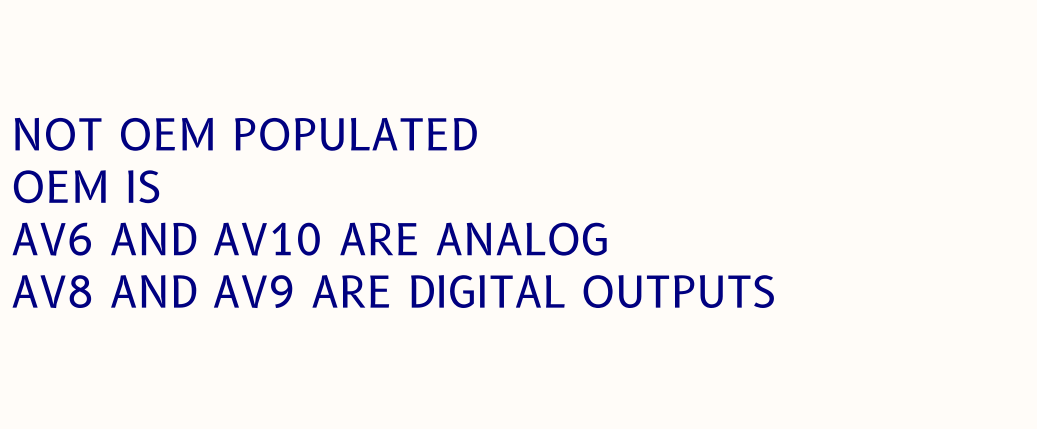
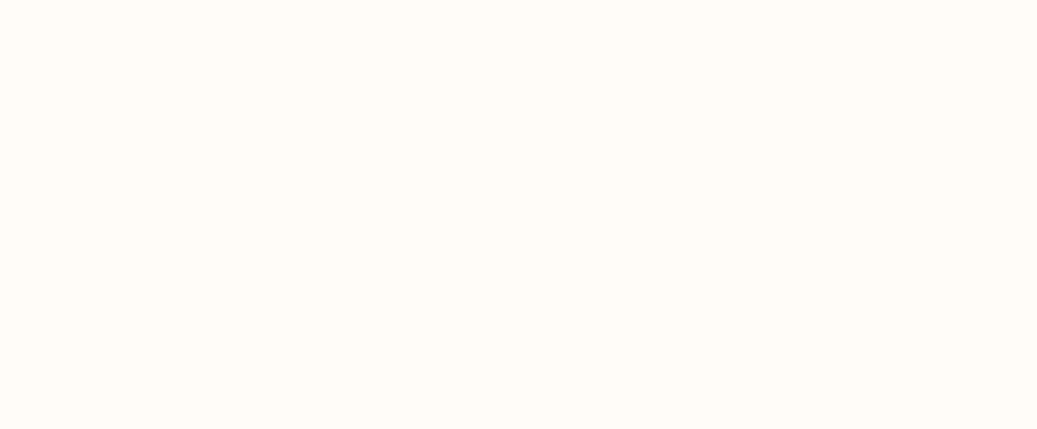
text: NOT OEM POPULATED (245, 134) -> none
text: OEM IS (86, 186) -> none
text: AV6 AND AV10 ARE ANALOG (309, 239) -> none
text: AV8 AND AV9 ARE DIGITAL OUTPUTS (393, 291) -> none

